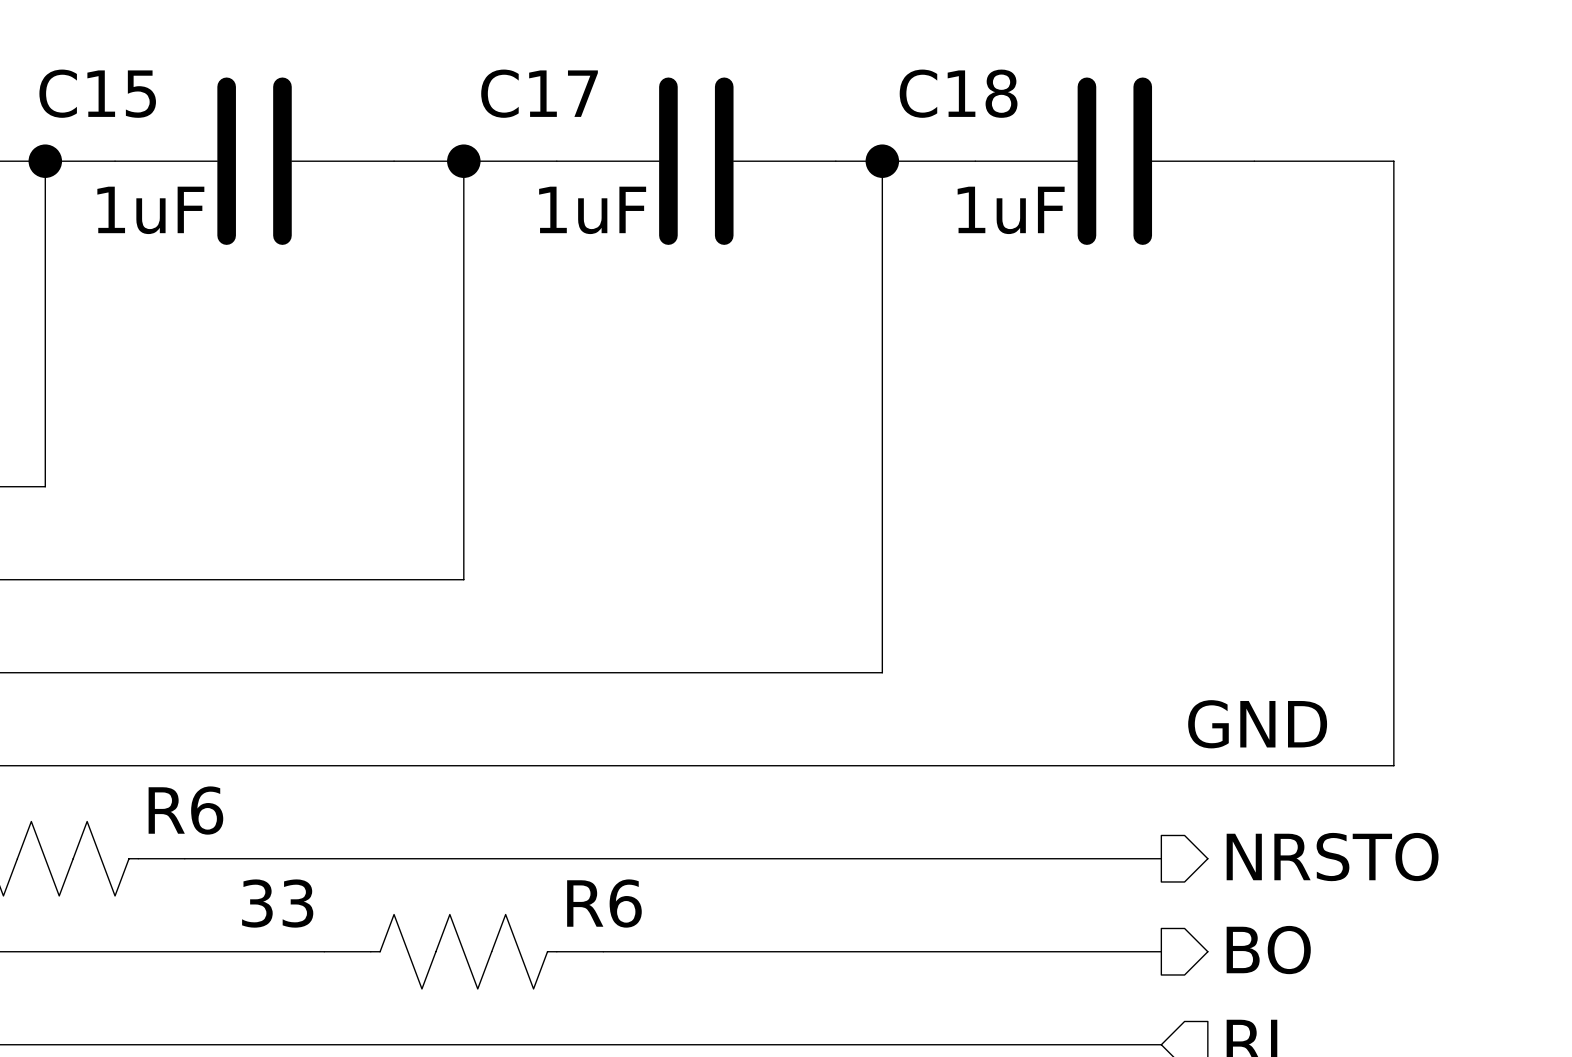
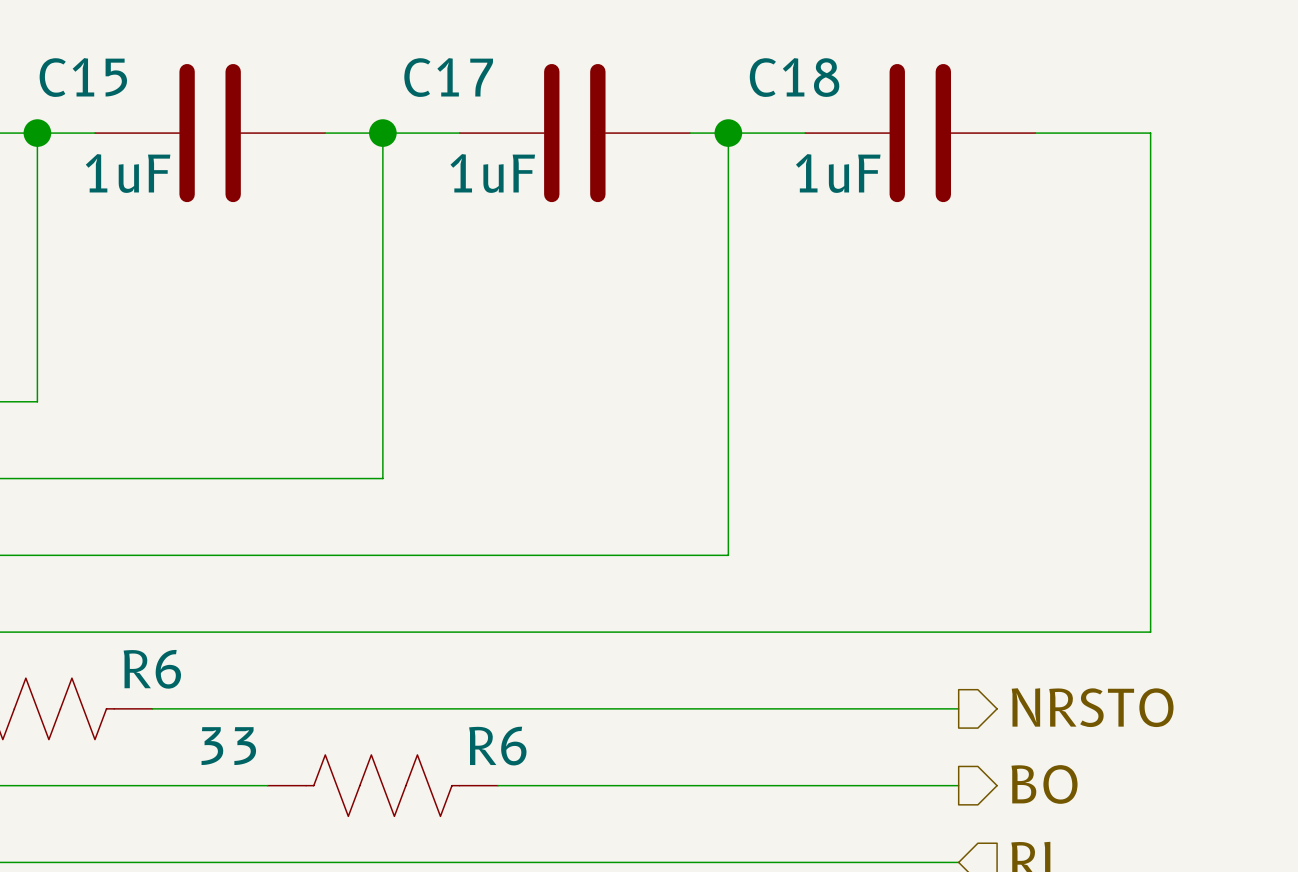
label: GND (1257, 724) -> none

